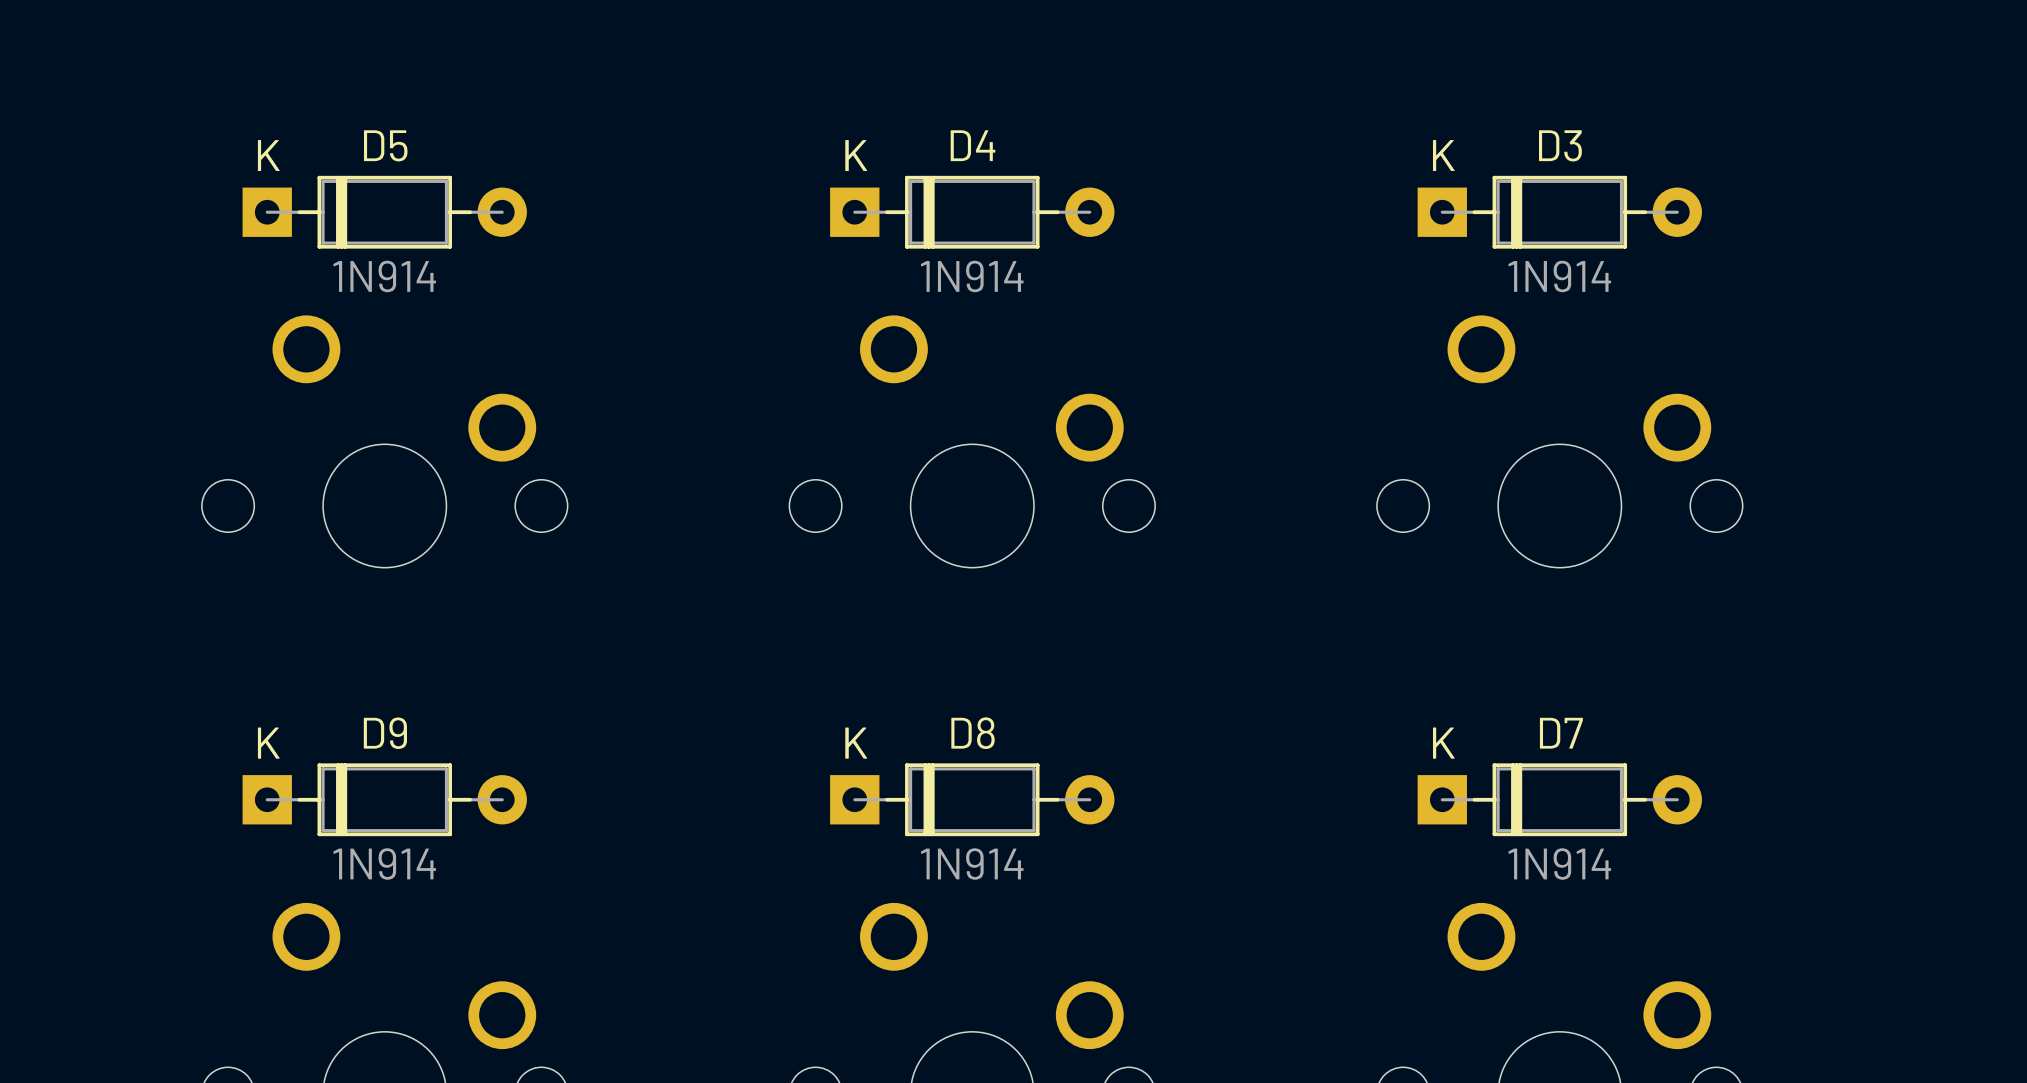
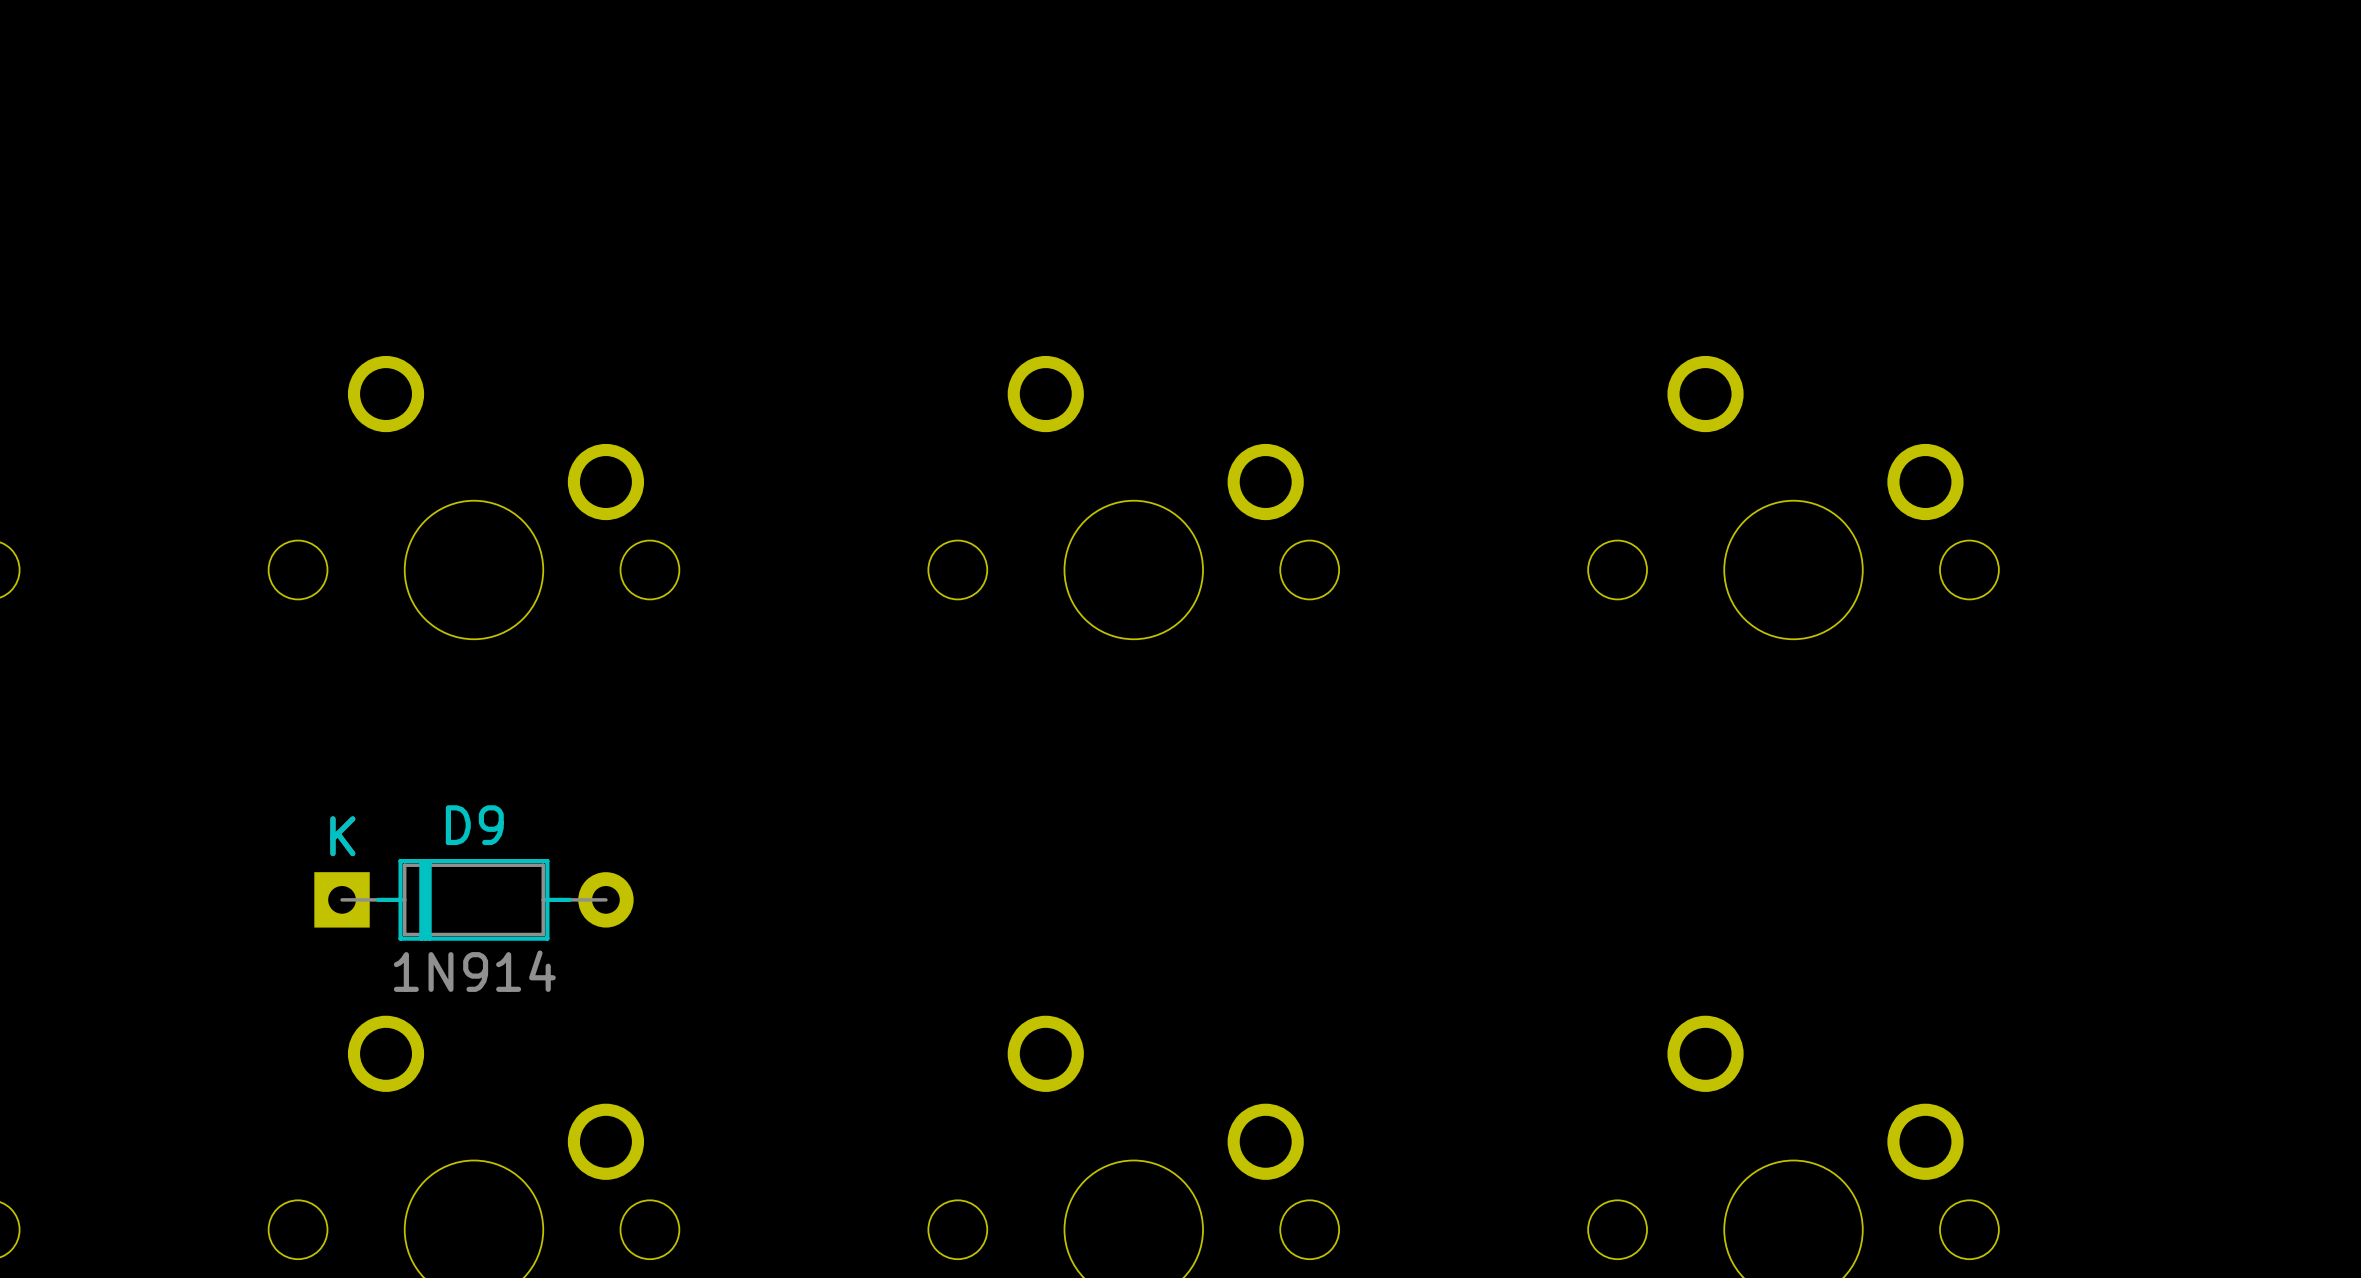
D5: 1N914 (384, 212) -> none
D4: 1N914 (972, 212) -> none
D3: 1N914 (1559, 212) -> none
D8: 1N914 (972, 799) -> none
D7: 1N914 (1559, 799) -> none

